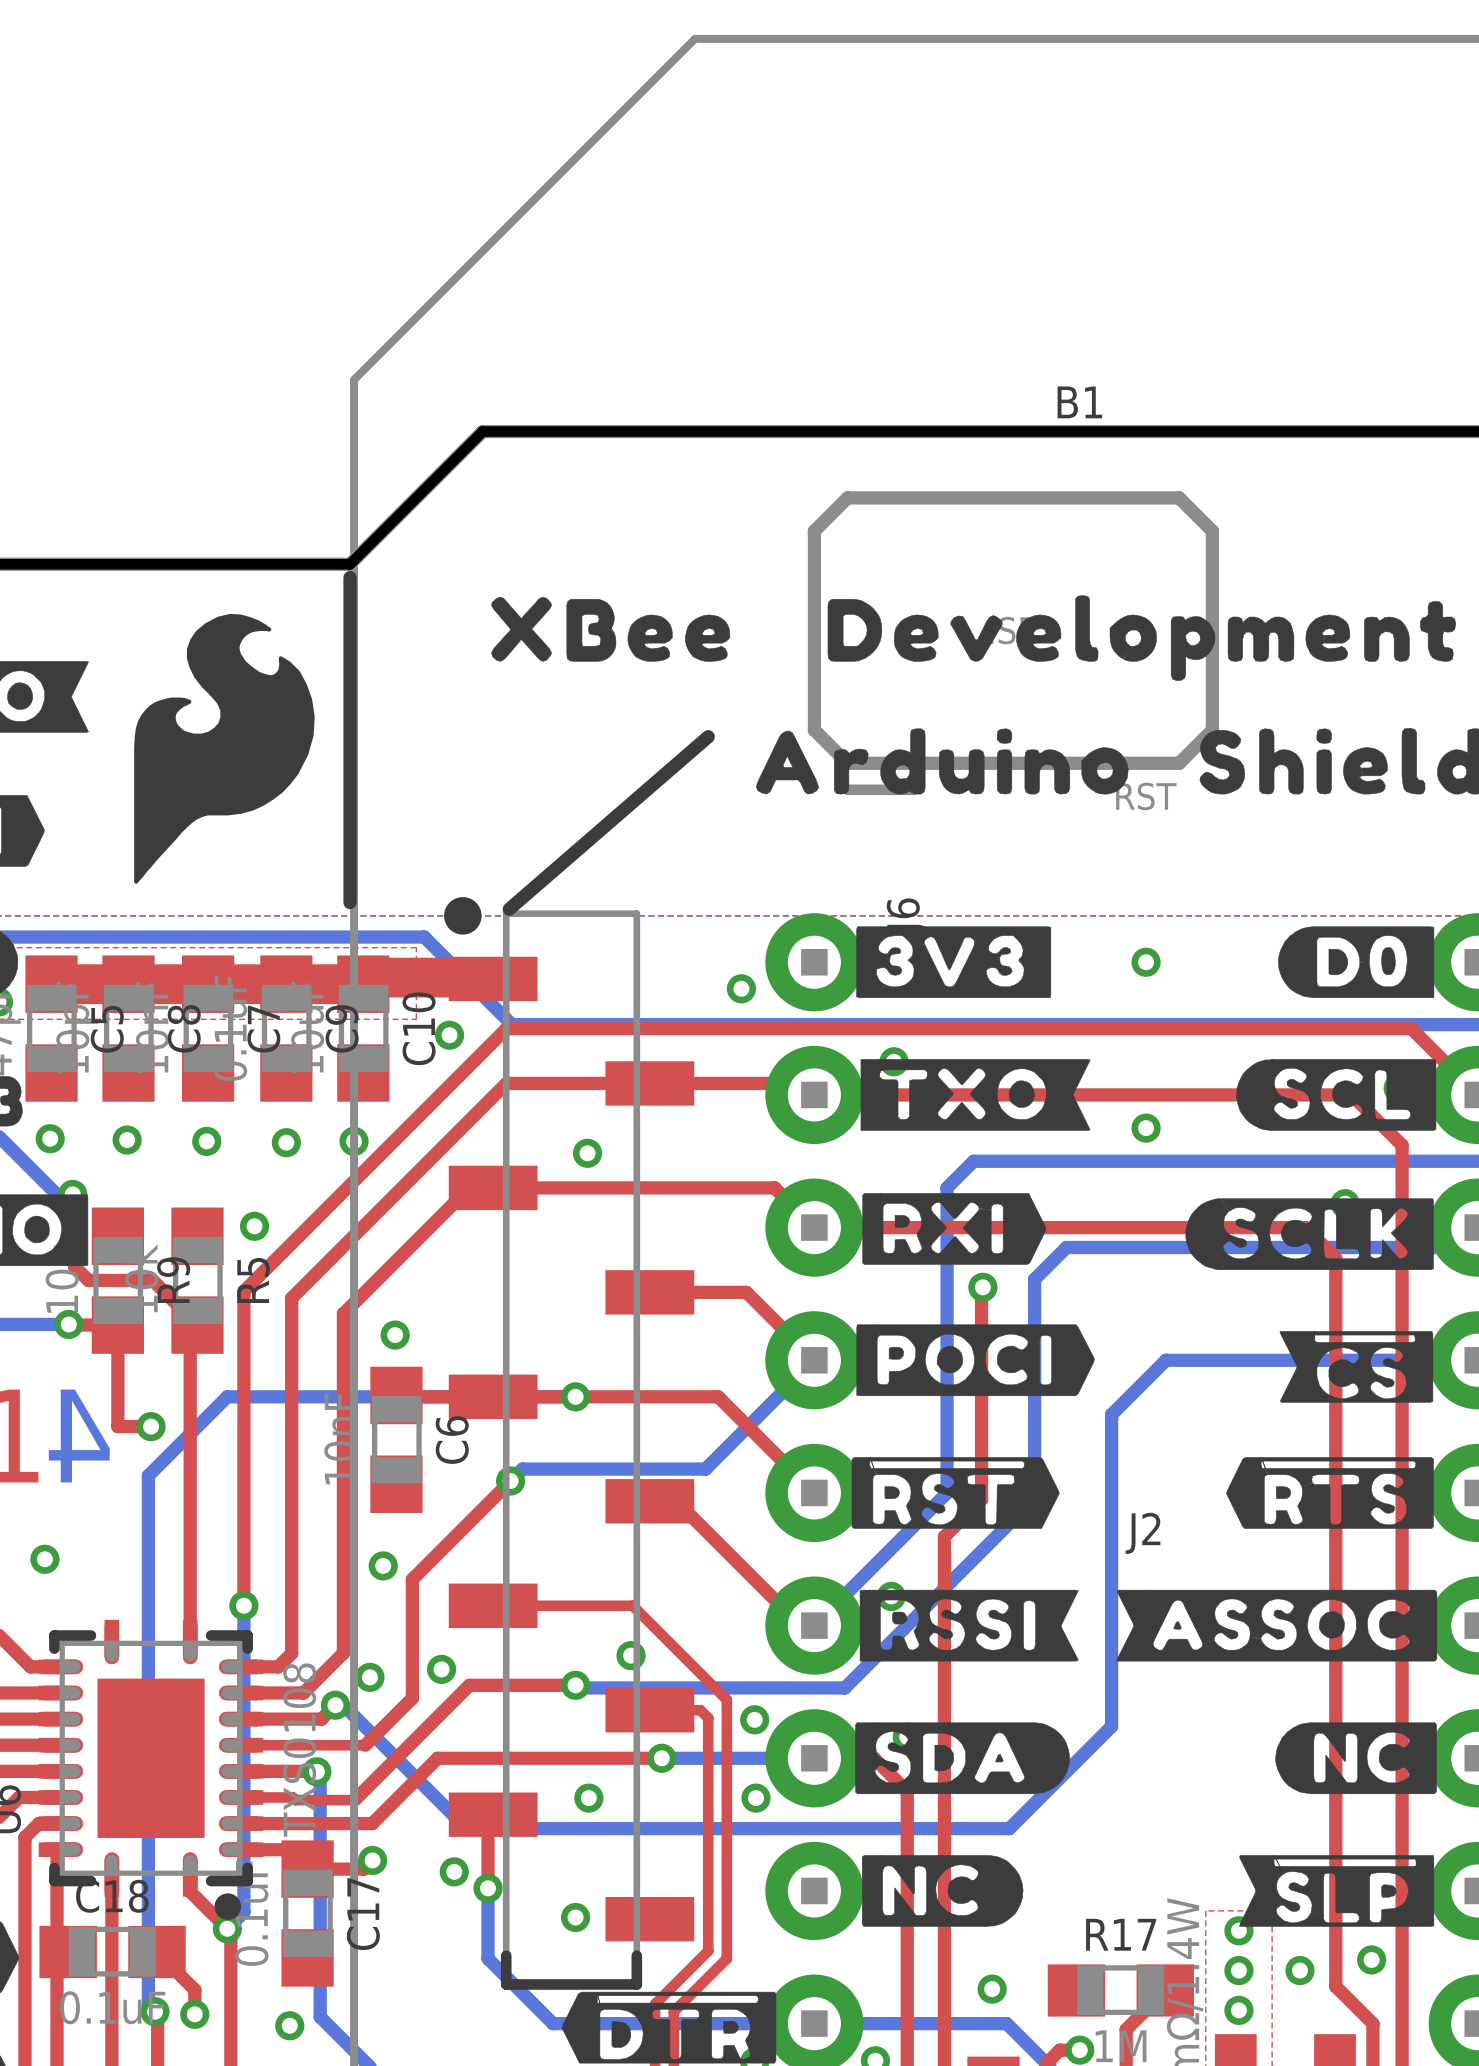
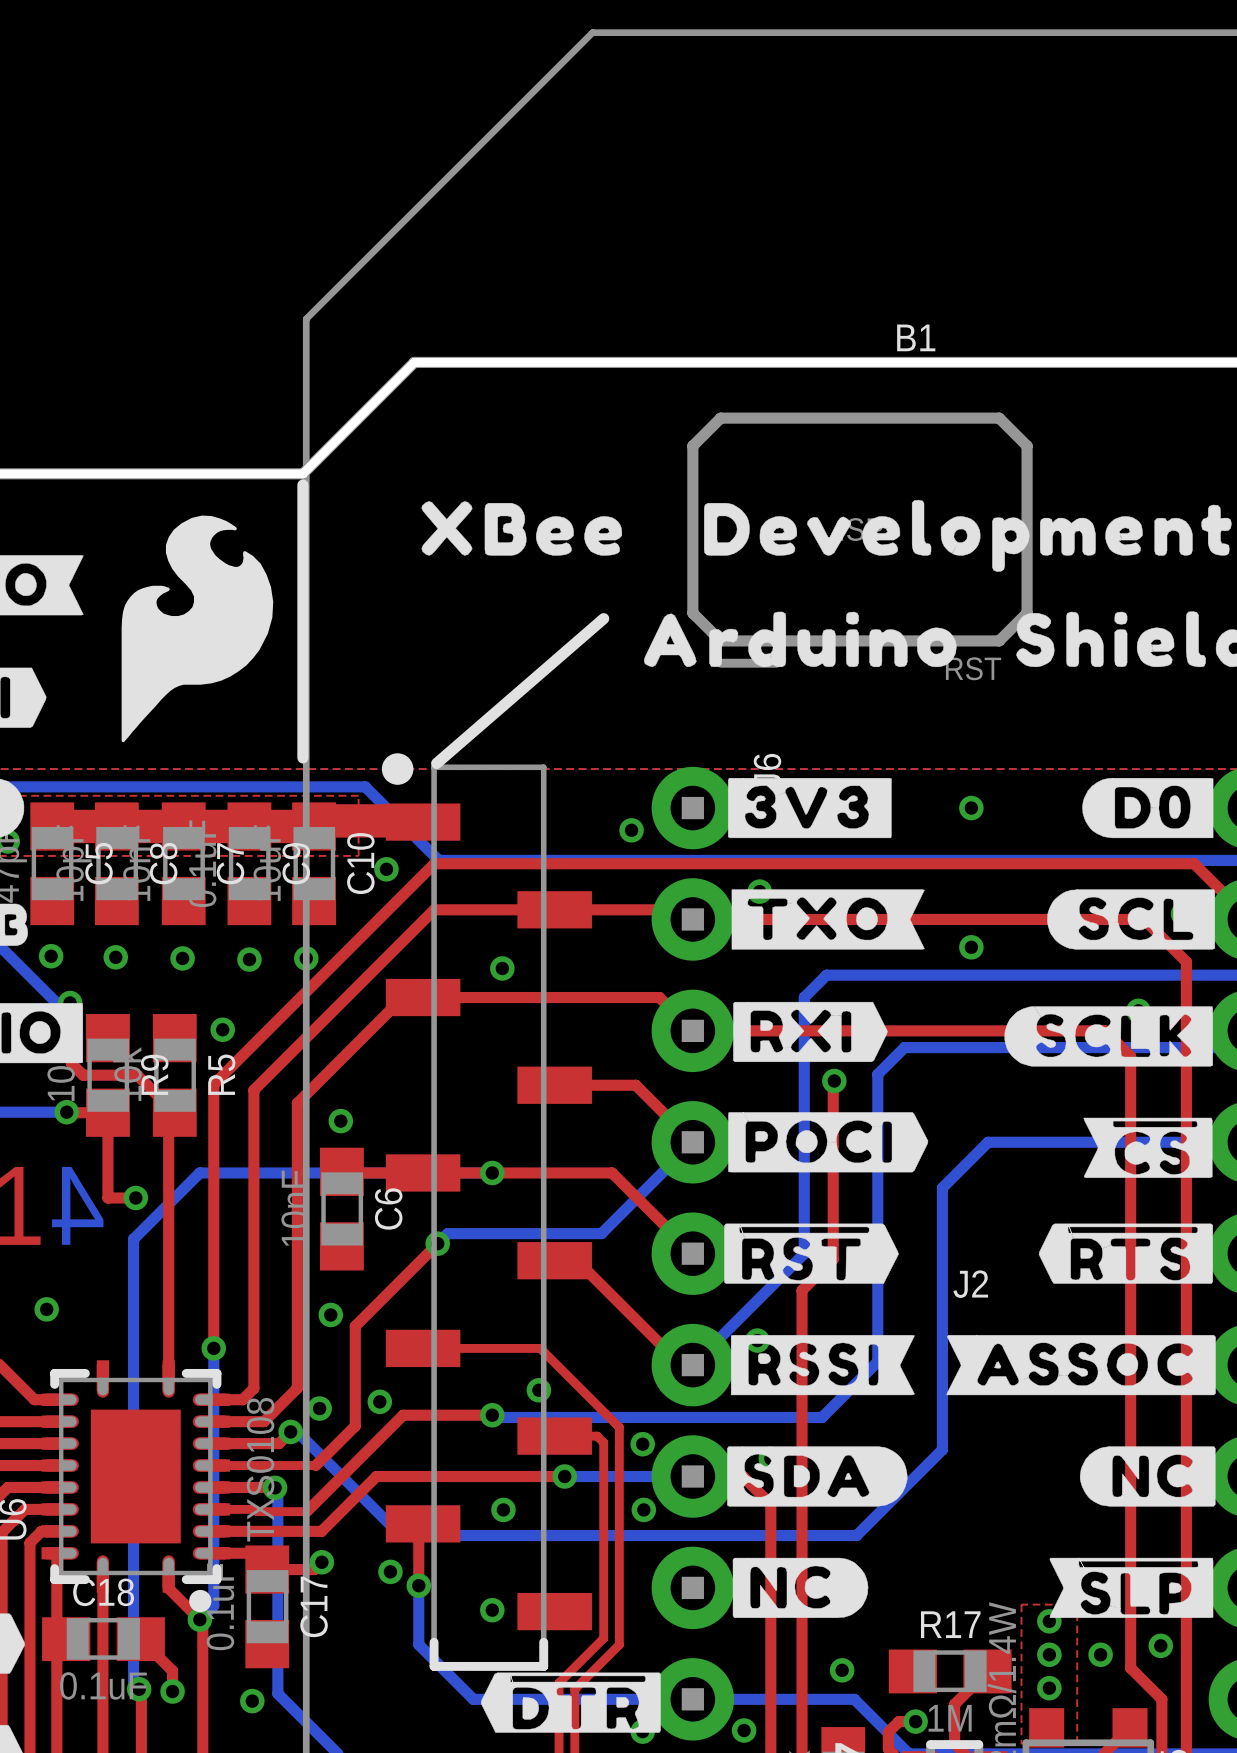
bottom track: (1034, 1498) (844, 1687) -> (877, 1258) (877, 1361) (822, 1417) (718, 1417)

